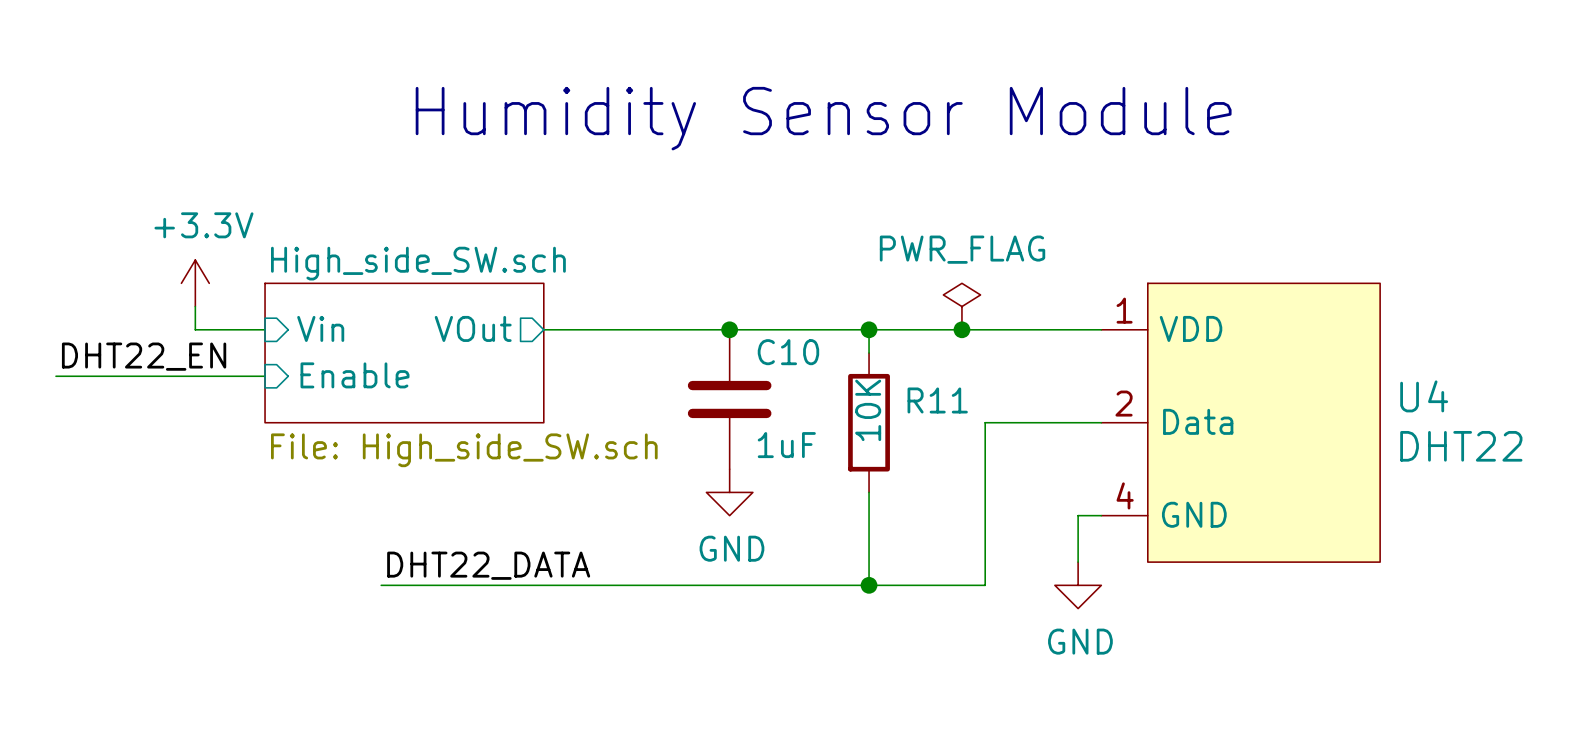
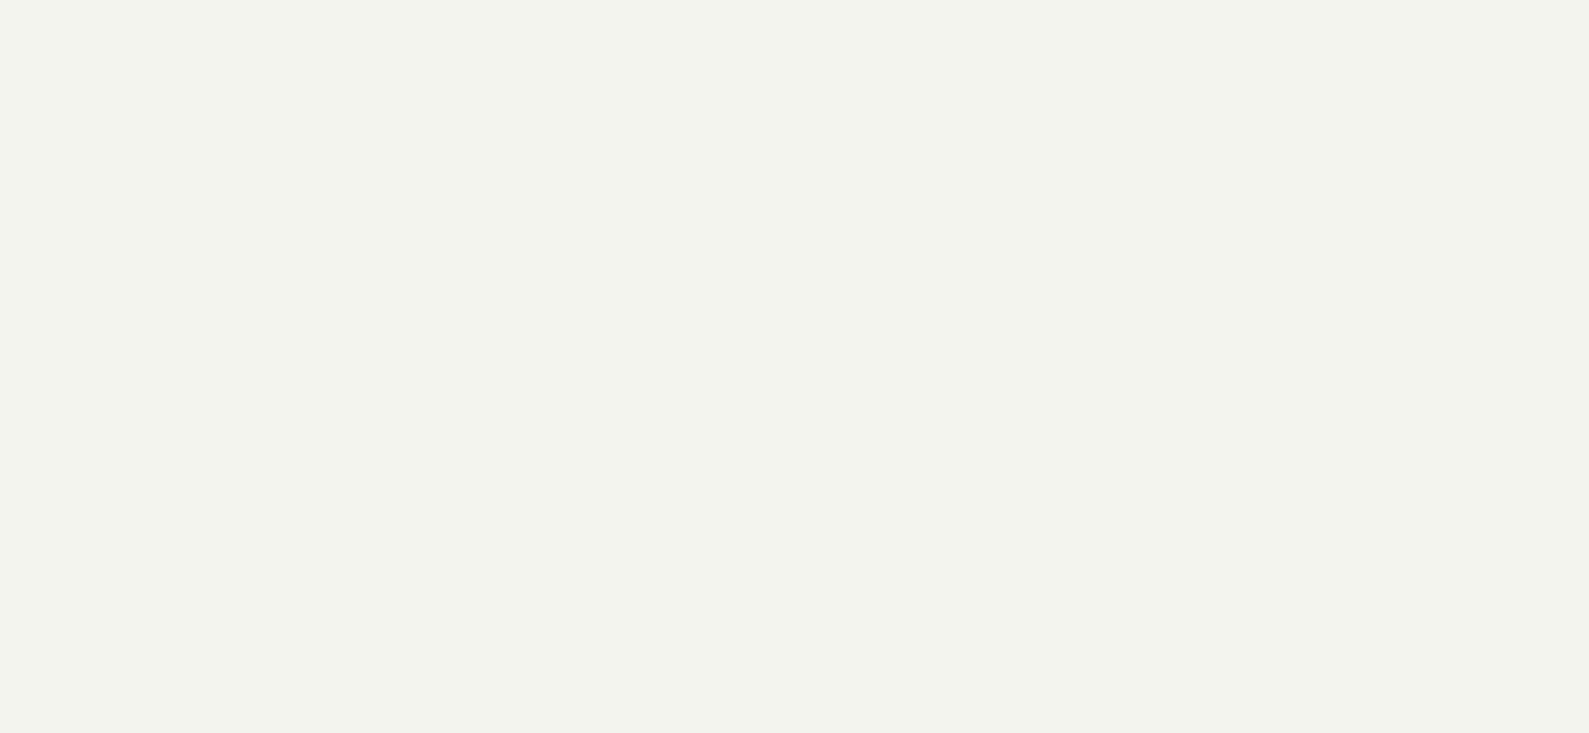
text: Humidity Sensor Module (823, 118) -> none
power symbol: +3.3V (195, 283) -> none
wire: (195, 306) (195, 329) (265, 329) -> none
power symbol: PWR_FLAG (961, 306) -> none
sheet pin: Vin (320, 328) -> none
sheet pin: VOut (473, 328) -> none
wire: (543, 329) (1101, 329) -> none
junction: (729, 329) -> none
wire: (869, 329) (869, 353) -> none
junction: (869, 329) -> none
junction: (961, 329) -> none
sheet High_side_SW.sch: File: High_side_SW.sch (404, 353) -> none
label: DHT22_EN (144, 356) -> none
sheet pin: Enable (355, 375) -> none
wire: (55, 376) (265, 376) -> none
C10: 1uF (729, 399) -> none
R11: 10K (869, 422) -> none
wire: (1101, 422) (985, 422) (985, 585) (381, 585) -> none
U4: DHT22 (1240, 422) -> none
power symbol: GND (729, 492) -> none
wire: (869, 492) (869, 585) -> none
wire: (1101, 515) (1078, 515) (1078, 562) -> none
label: DHT22_DATA (488, 565) -> none
junction: (869, 585) -> none
power symbol: GND (1078, 585) -> none

